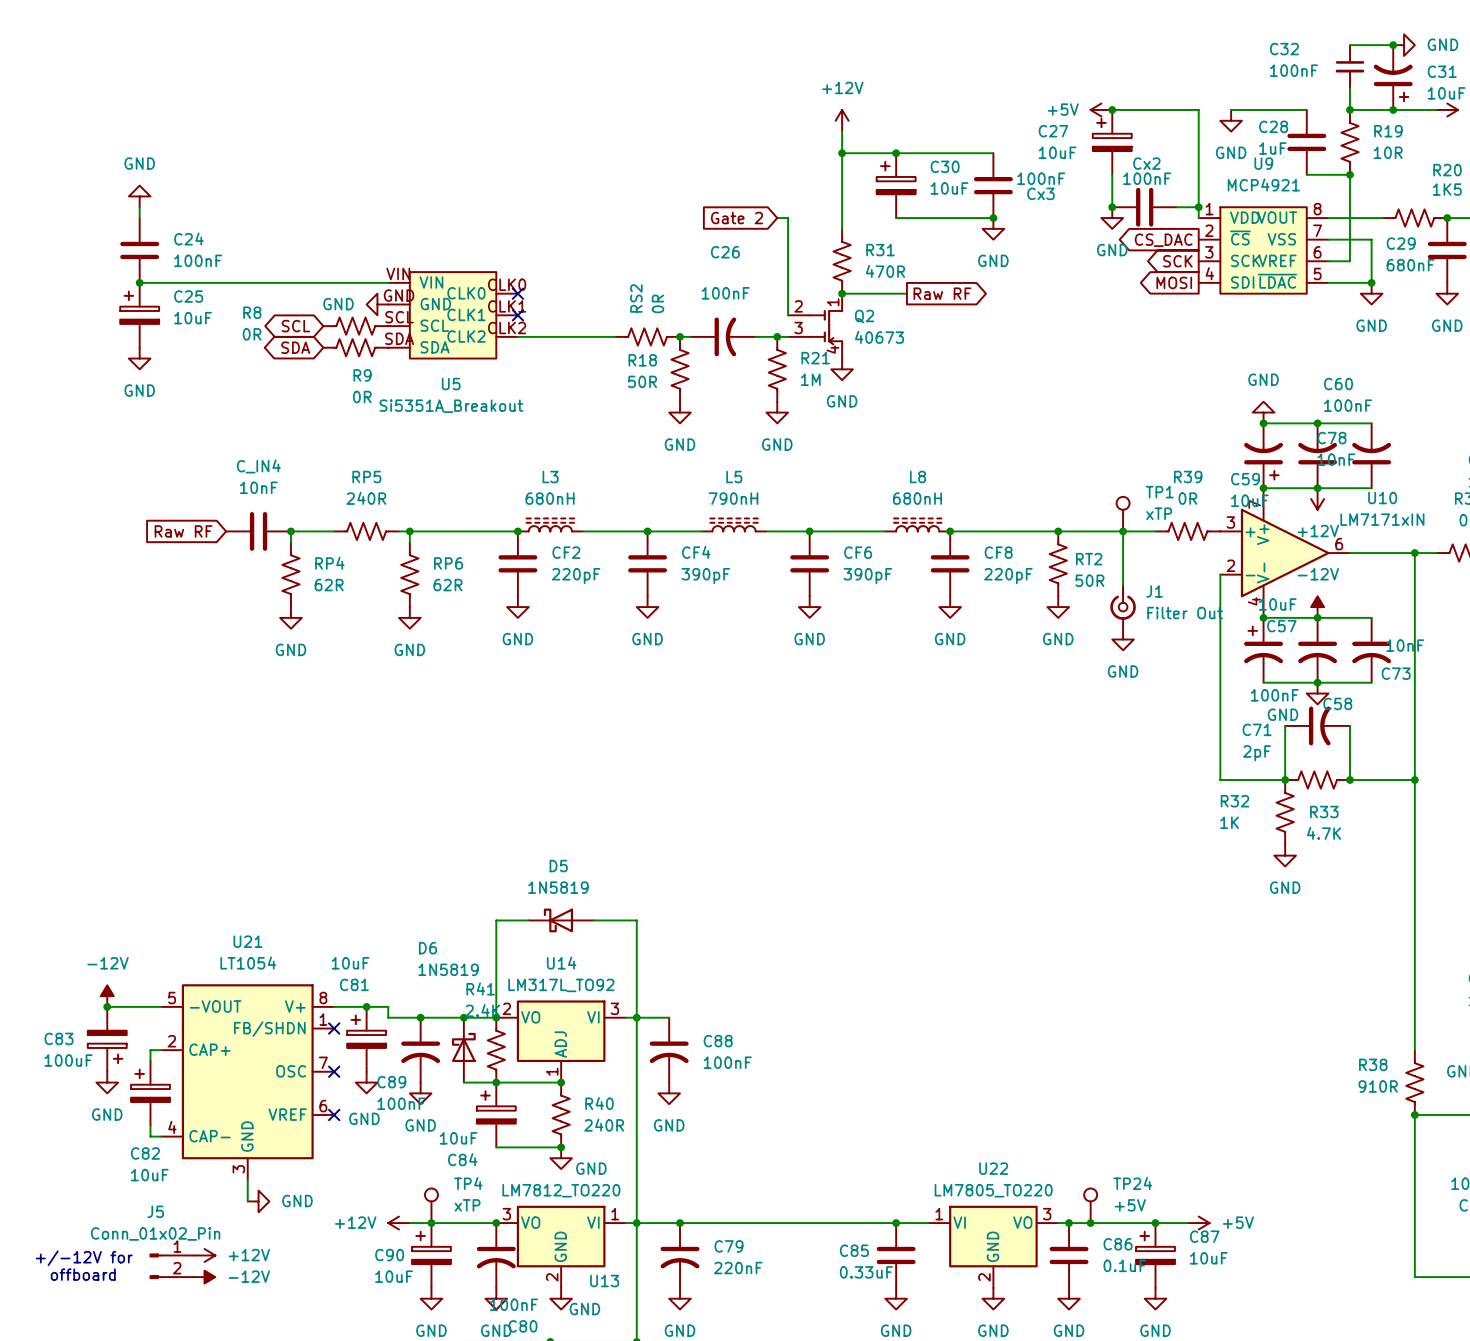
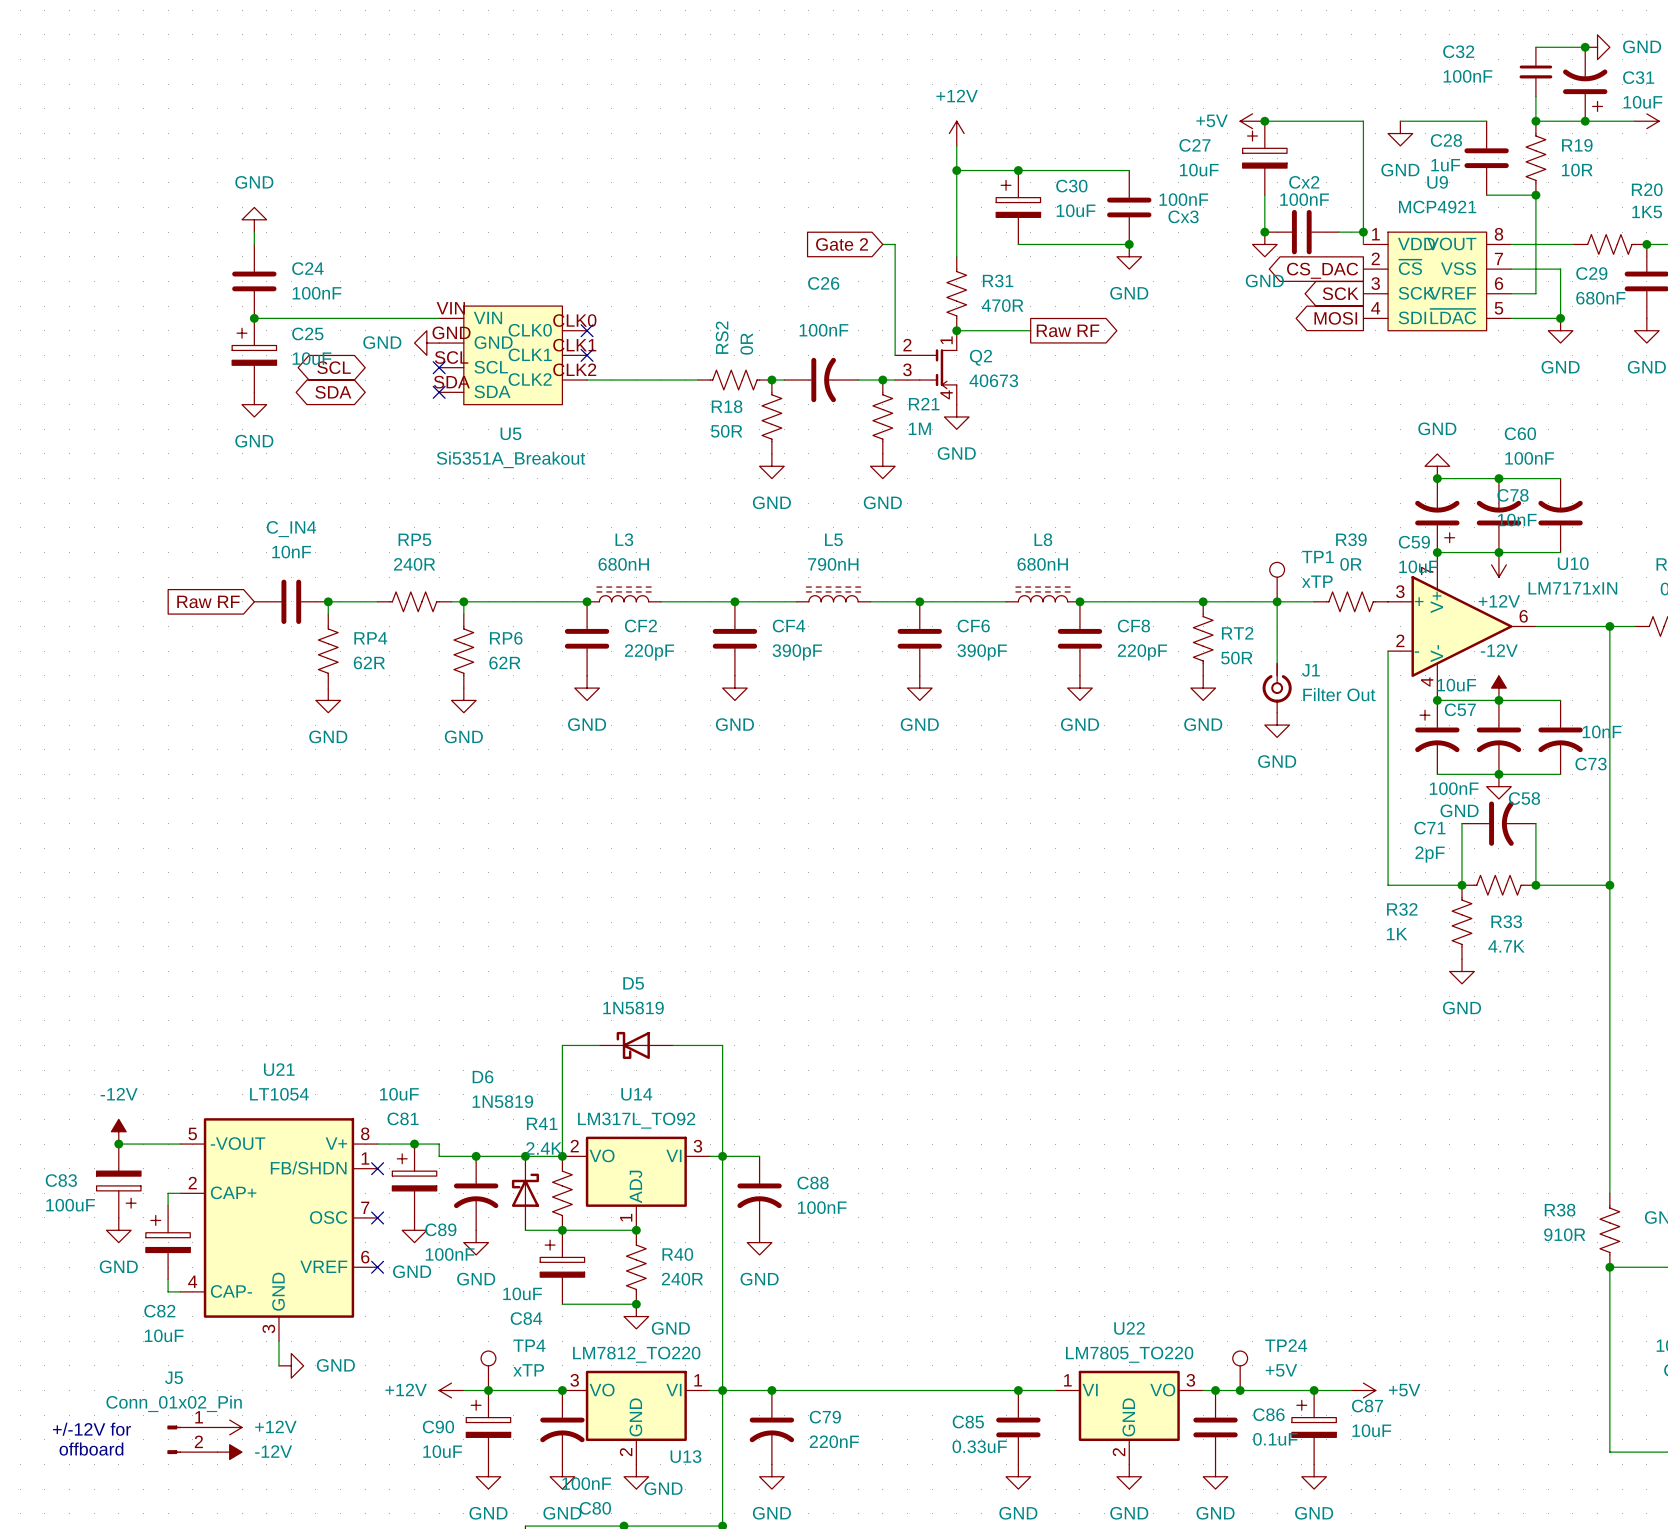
power symbol position: GND (139, 196) -> GND (254, 219)
wire: (139, 207) (139, 218) -> (254, 232) (254, 244)
C24 position: (139, 250) -> (254, 281)
wire: (139, 282) (226, 282) -> none
junction: (139, 282) -> none
junction: none -> (254, 318)
C25 position: (139, 315) -> (254, 355)
R8: 0R (355, 326) -> none
no-connect mark: none -> (439, 367)
R9: 0R (355, 347) -> none
no-connect mark: none -> (439, 392)
power symbol position: GND (139, 358) -> GND (254, 404)

